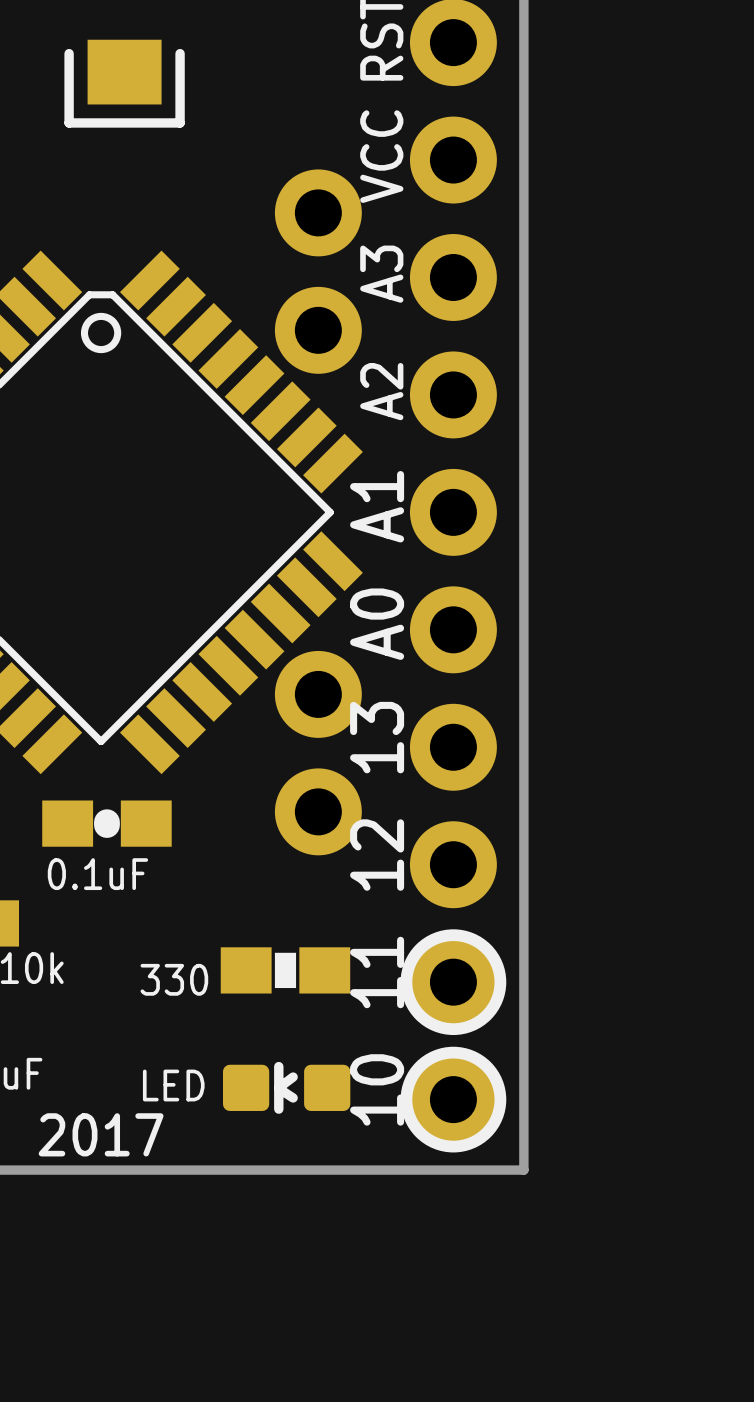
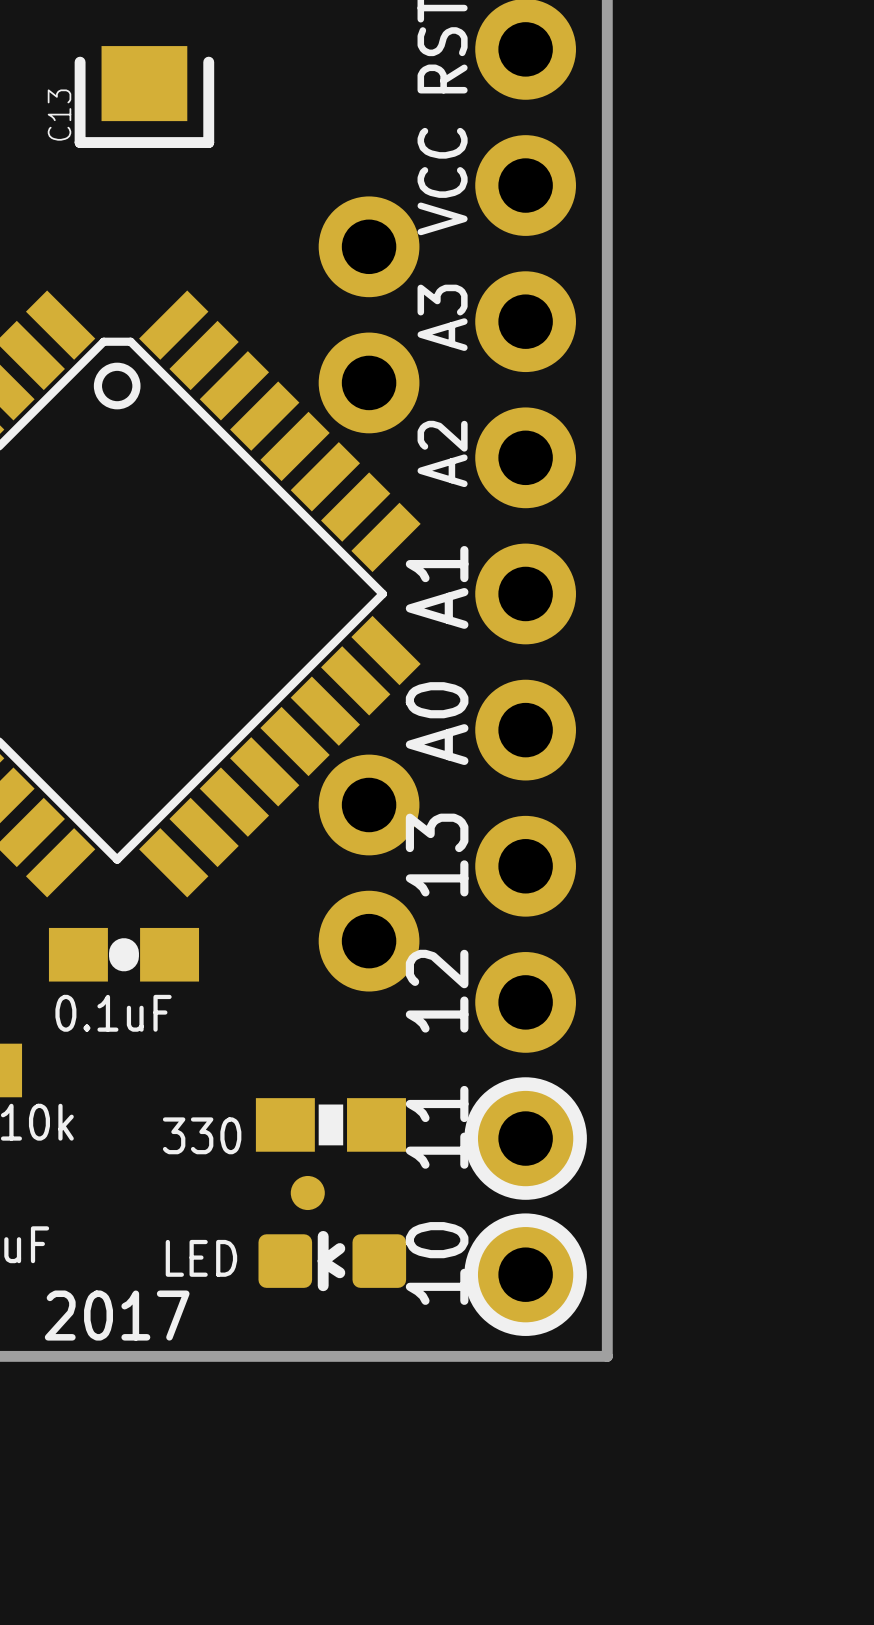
C13 name: none -> C13 (59, 115)
part: none -> (307, 1193)

